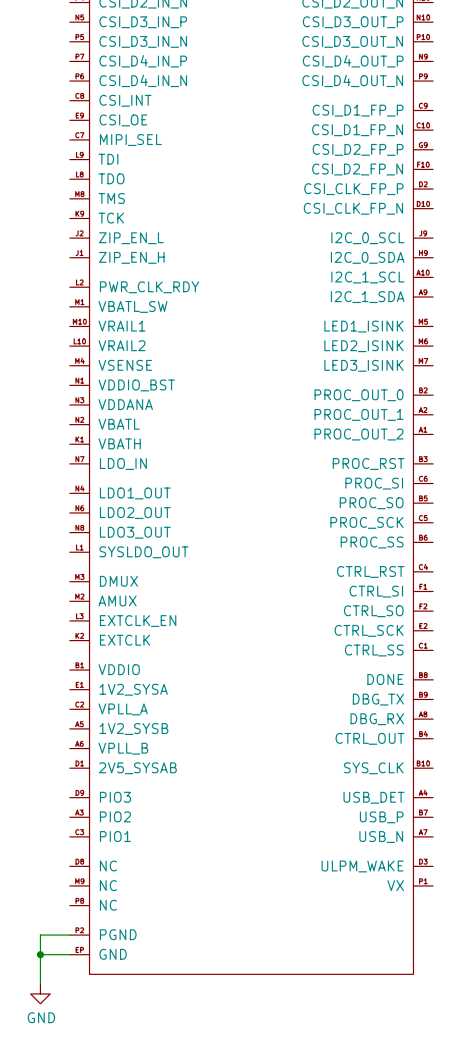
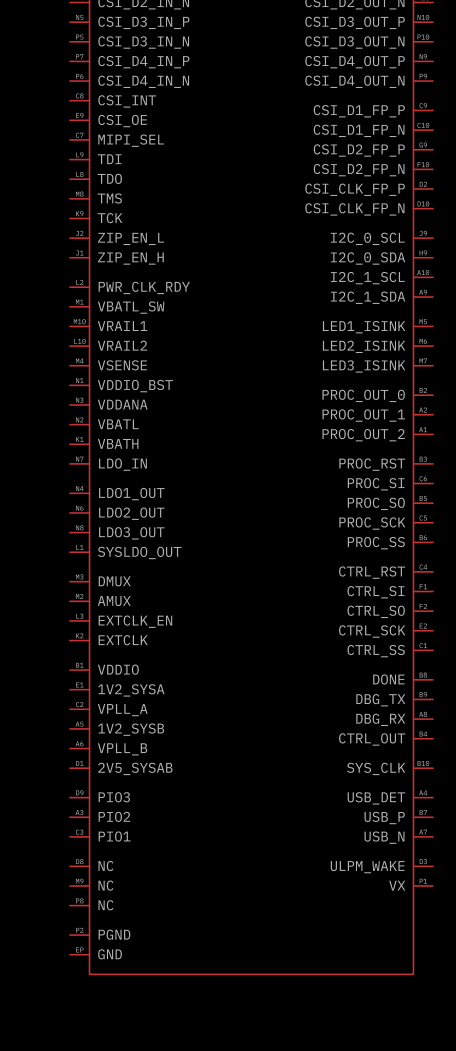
wire: (69, 935) (40, 935) (40, 984) -> none
wire: (40, 954) (69, 954) -> none
junction: (40, 954) -> none
power symbol: GND (40, 993) -> none

